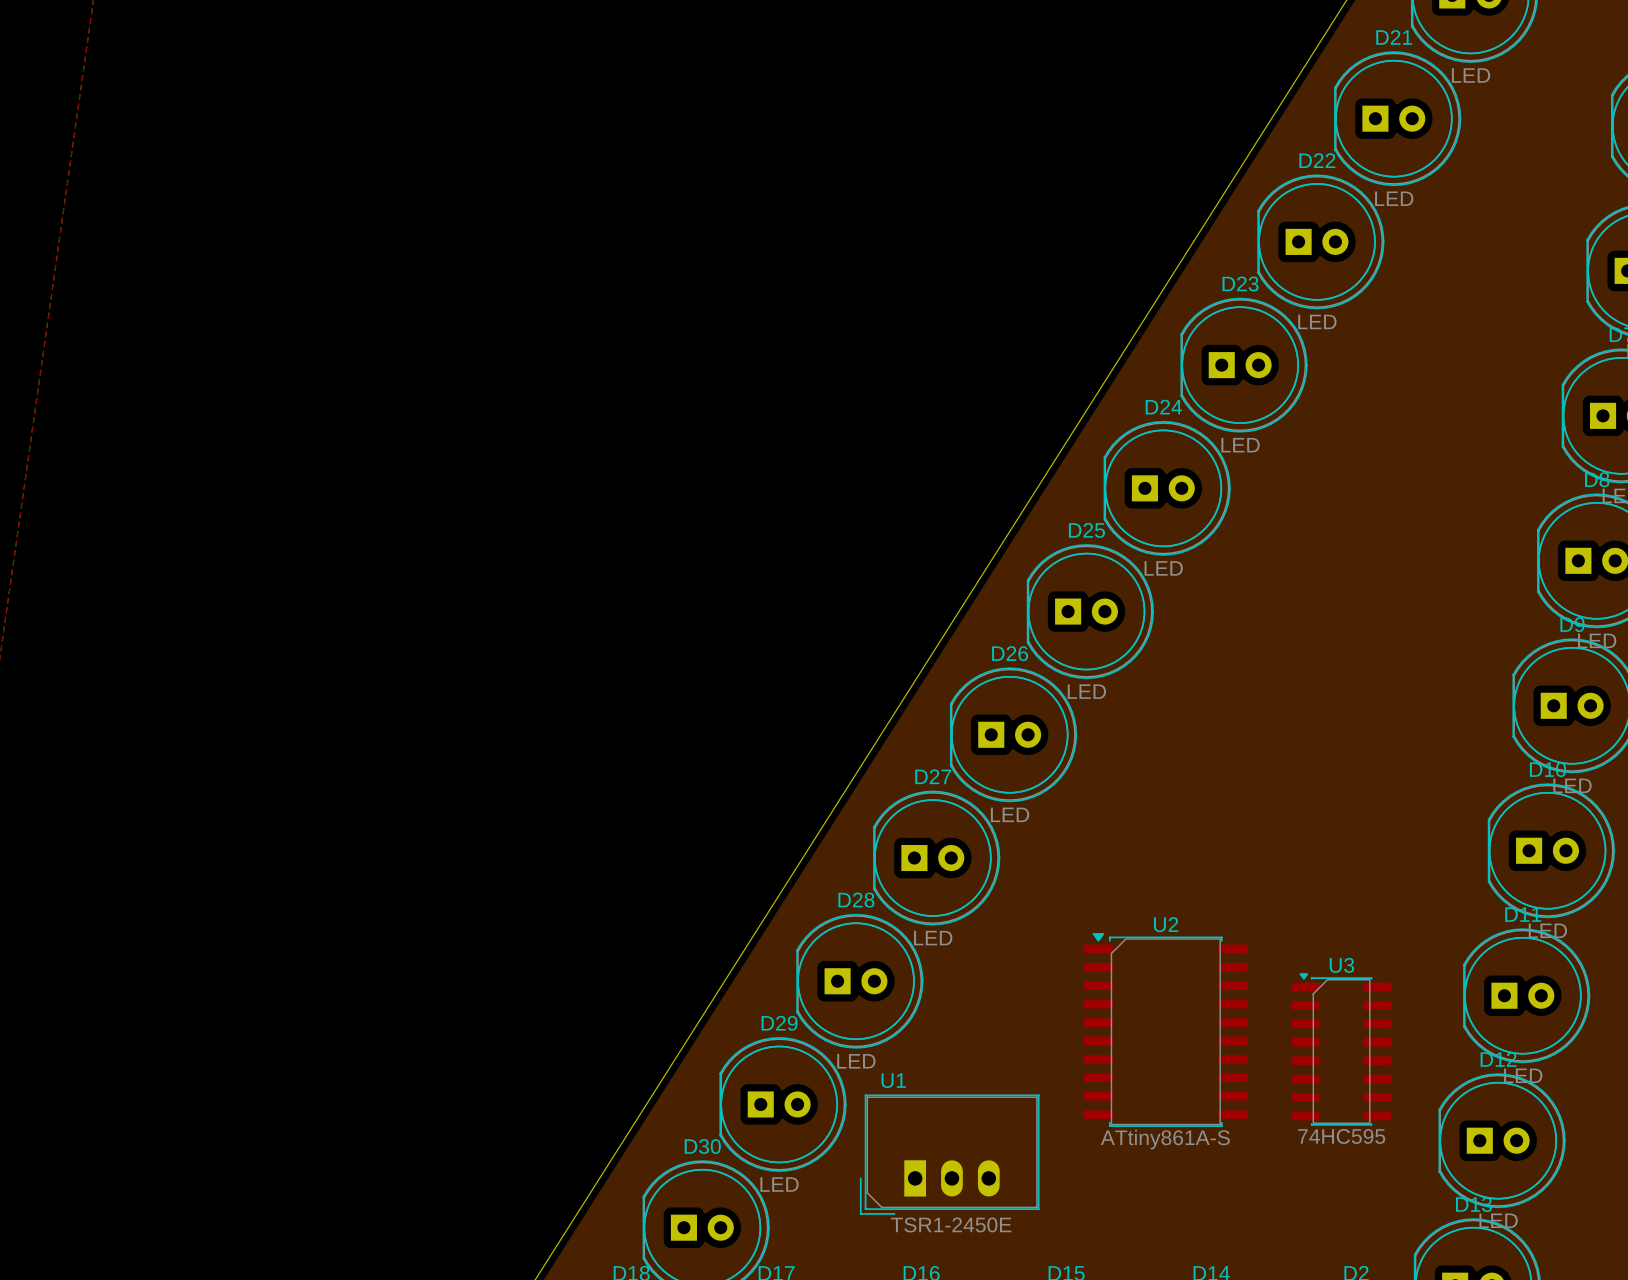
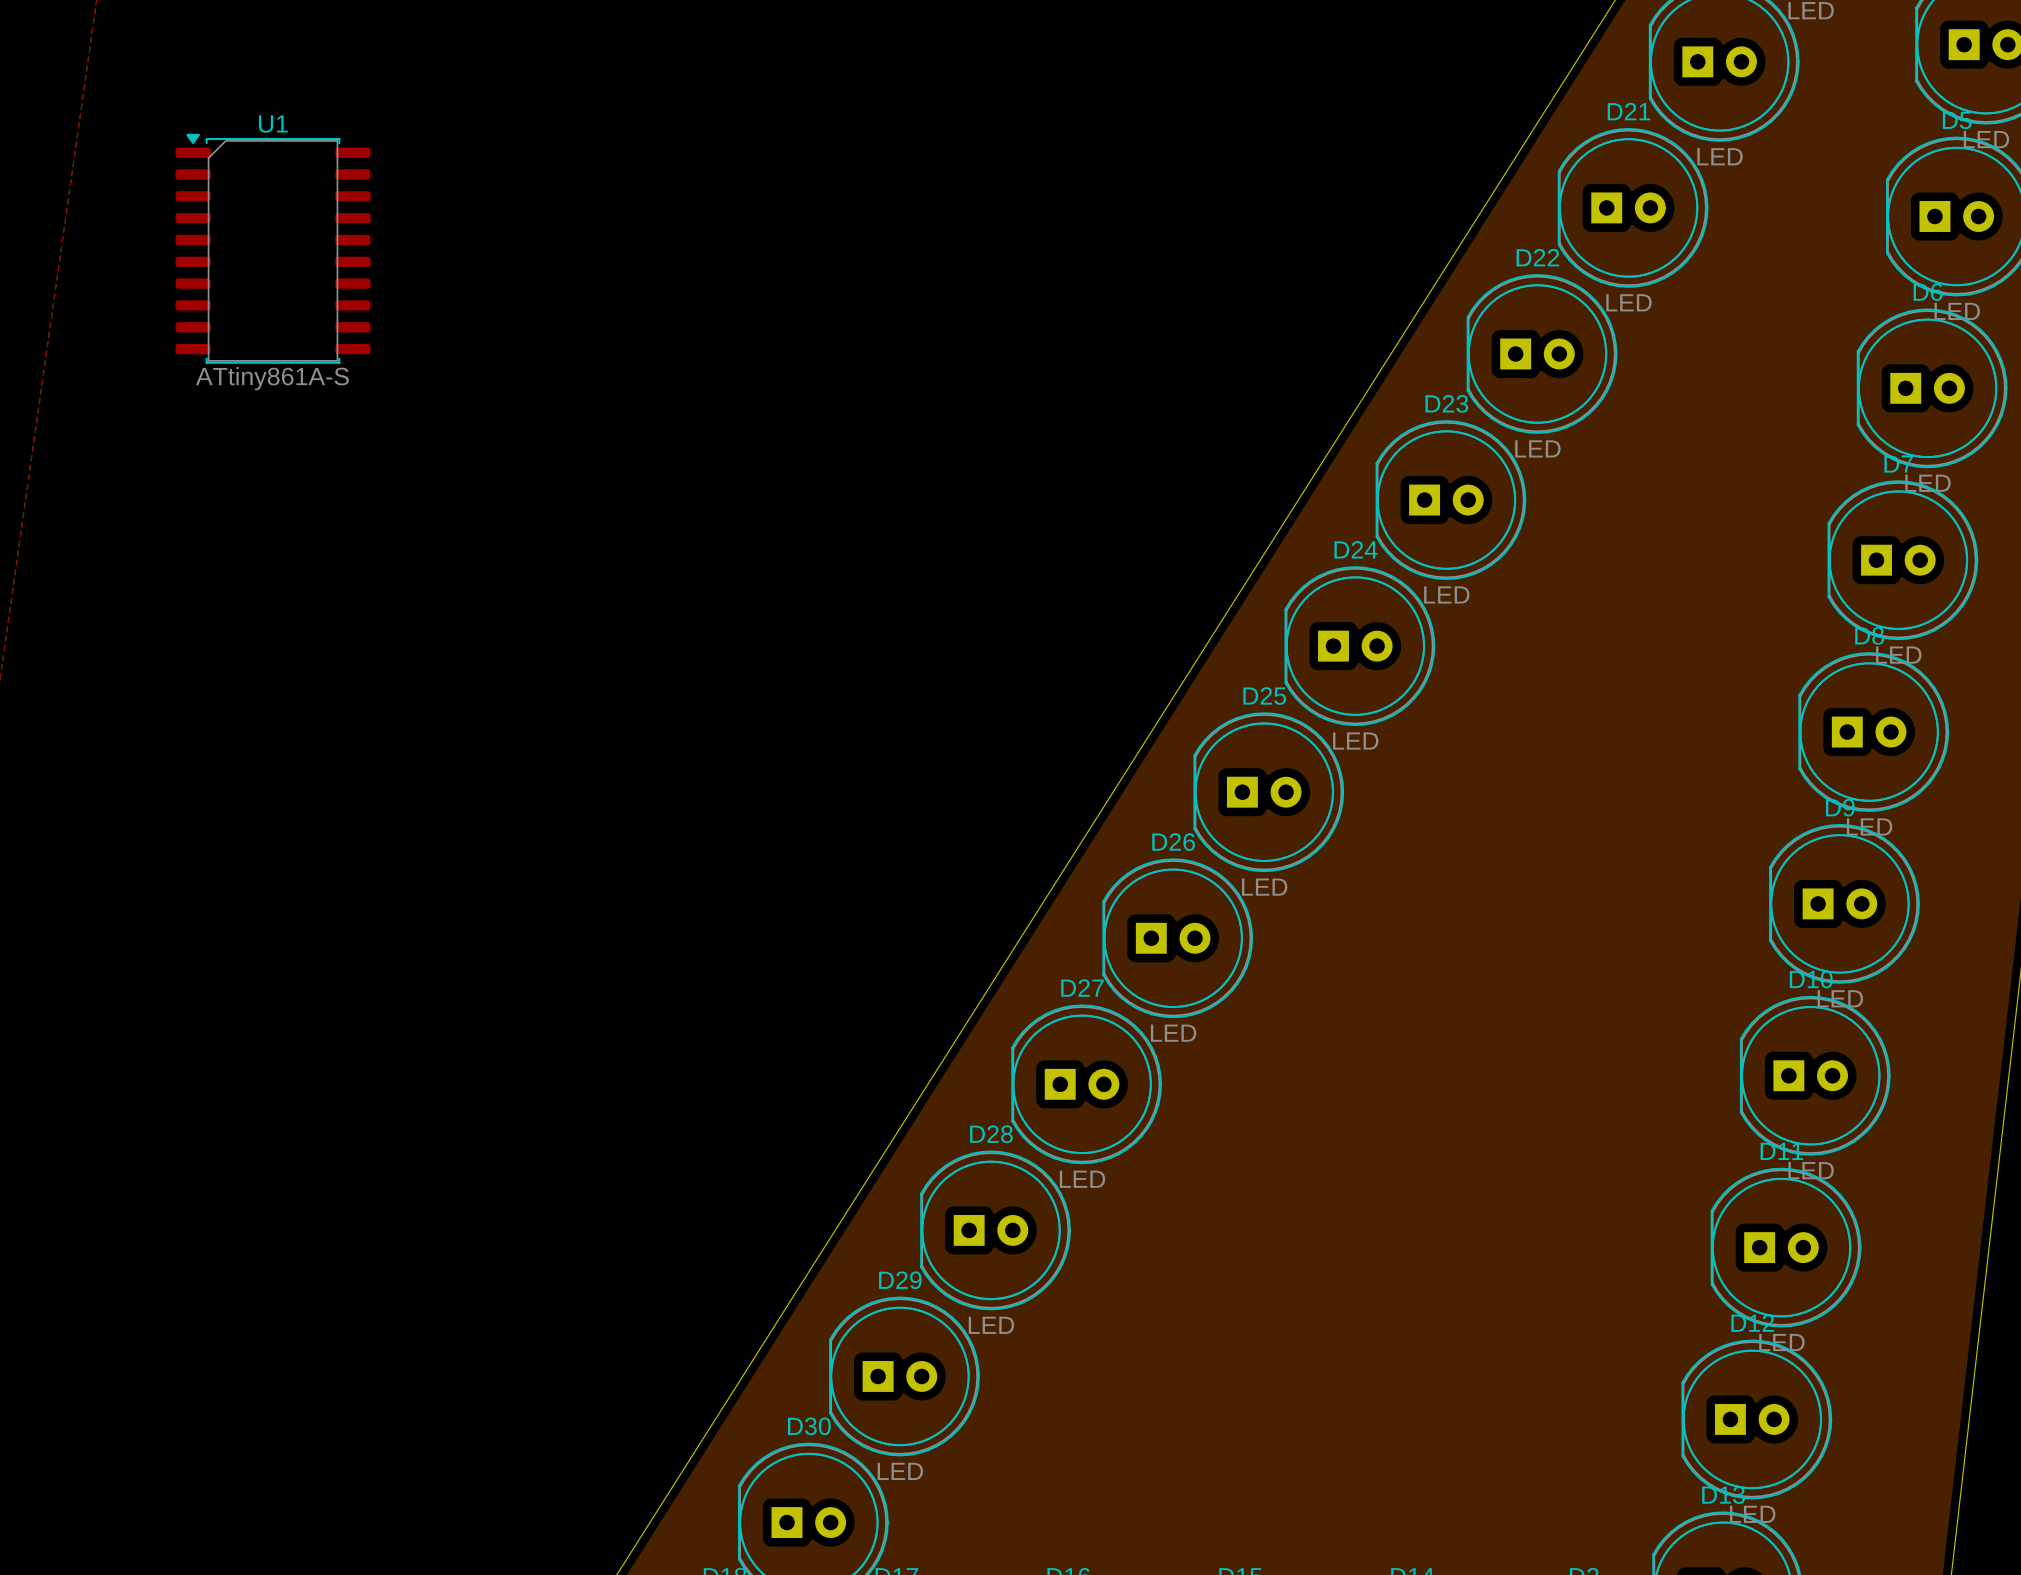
U2: ATtiny861A-S (1165, 1030) -> none
U3: 74HC595 (1341, 1049) -> none
U1 name position: U1 (893, 1080) -> U1 (273, 124)
U1 footprint: [859, 1094, 1040, 1215] -> [175, 133, 371, 364]
U1 value: TSR1-2450E (951, 1224) -> ATtiny861A-S (272, 378)

